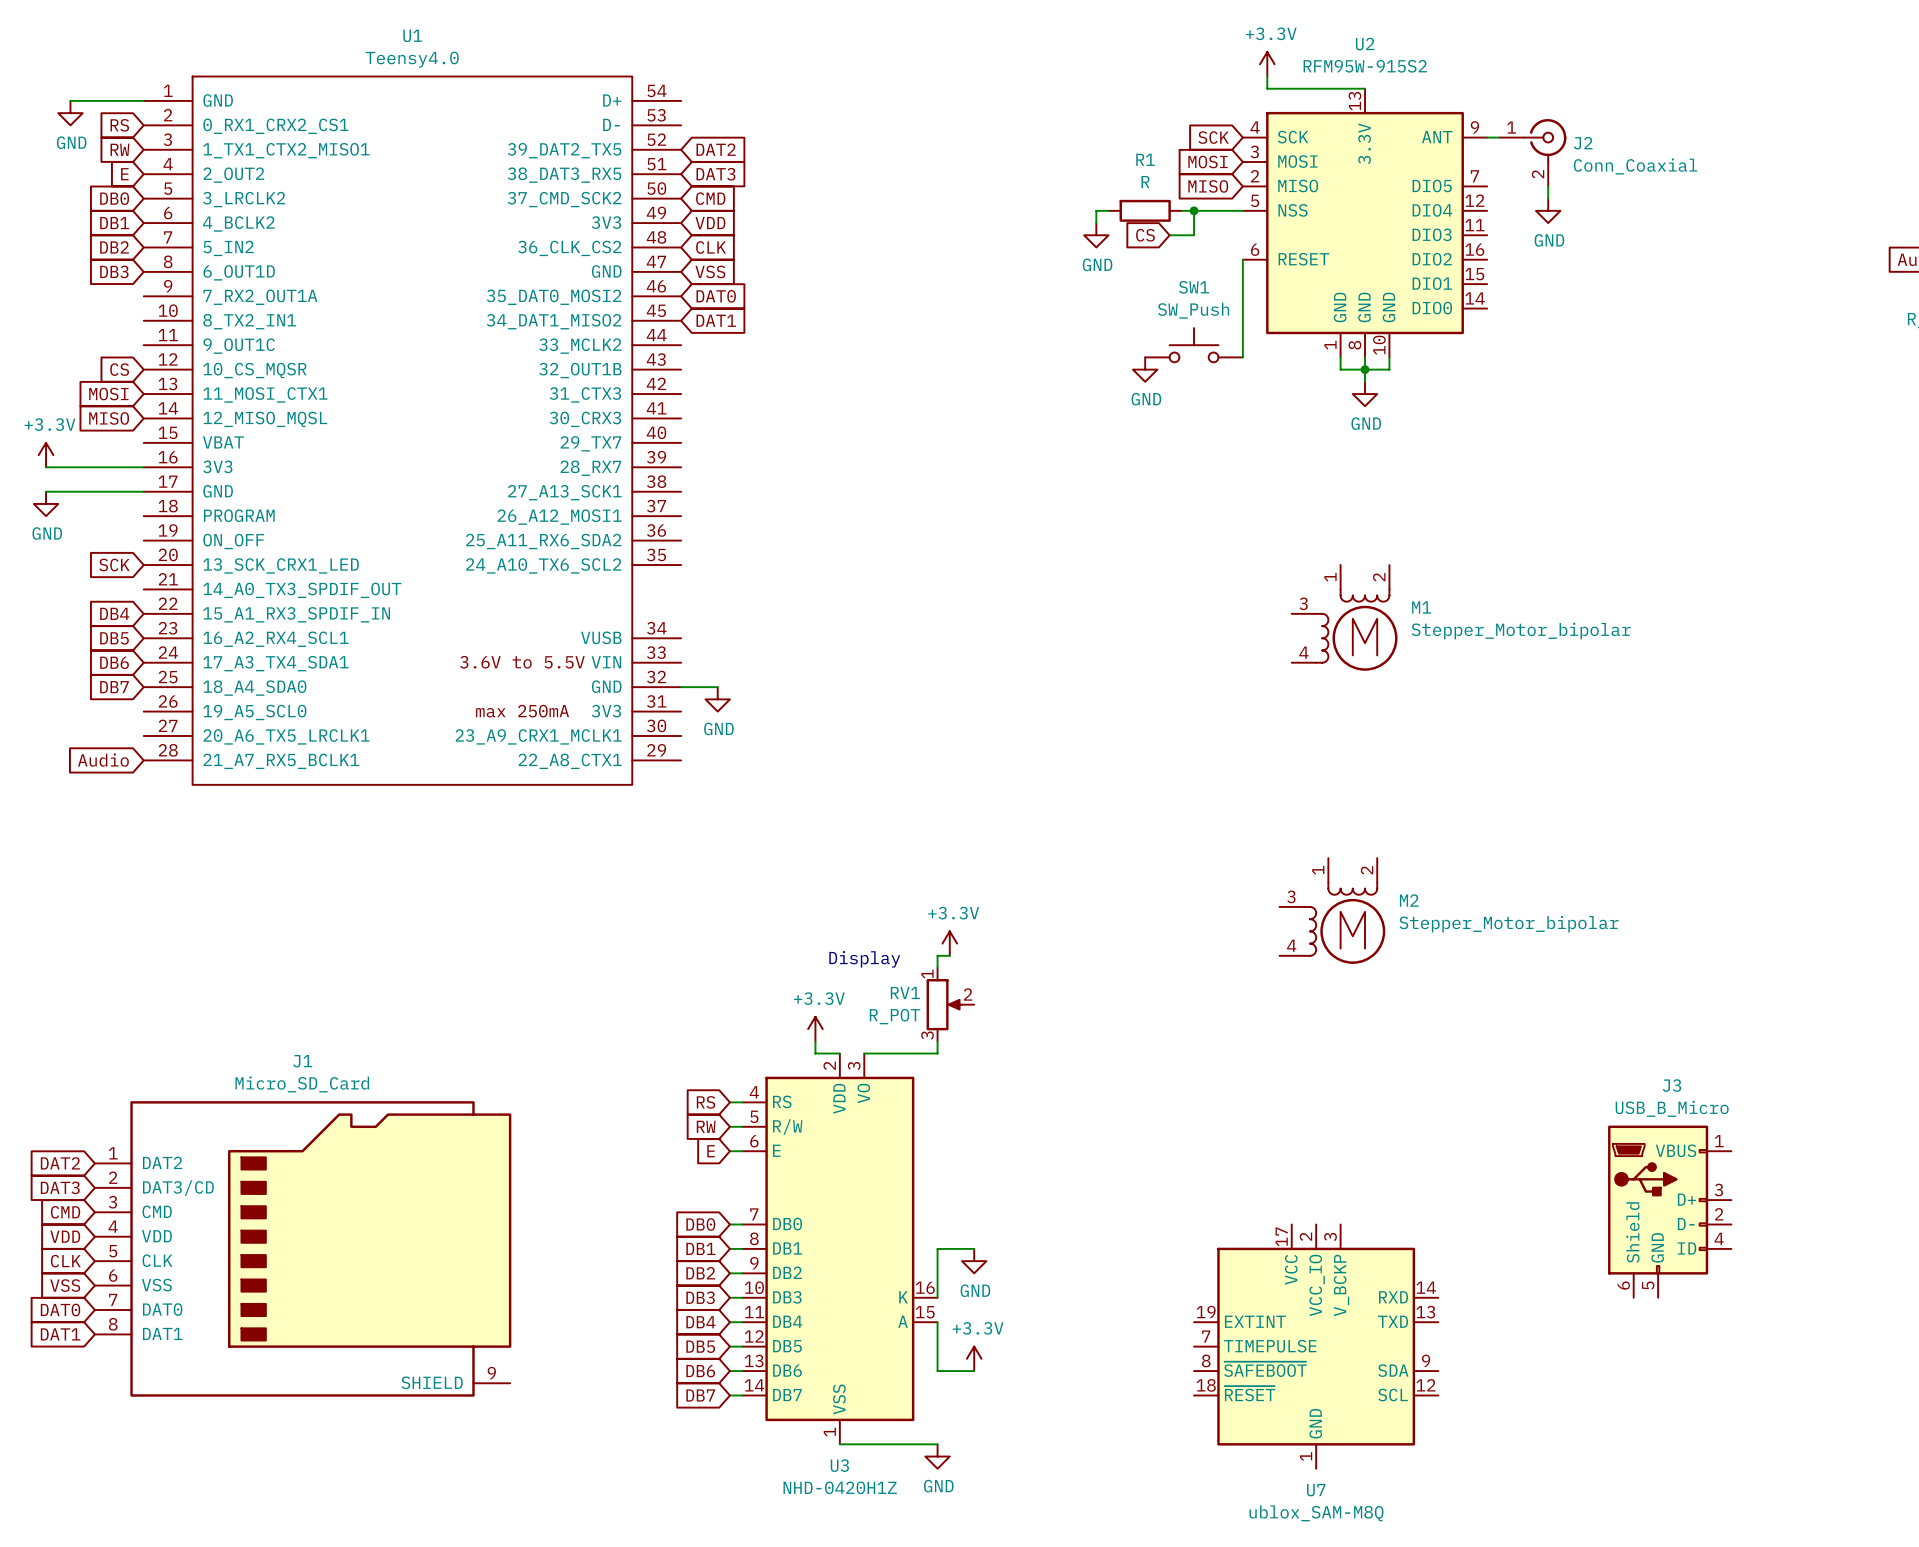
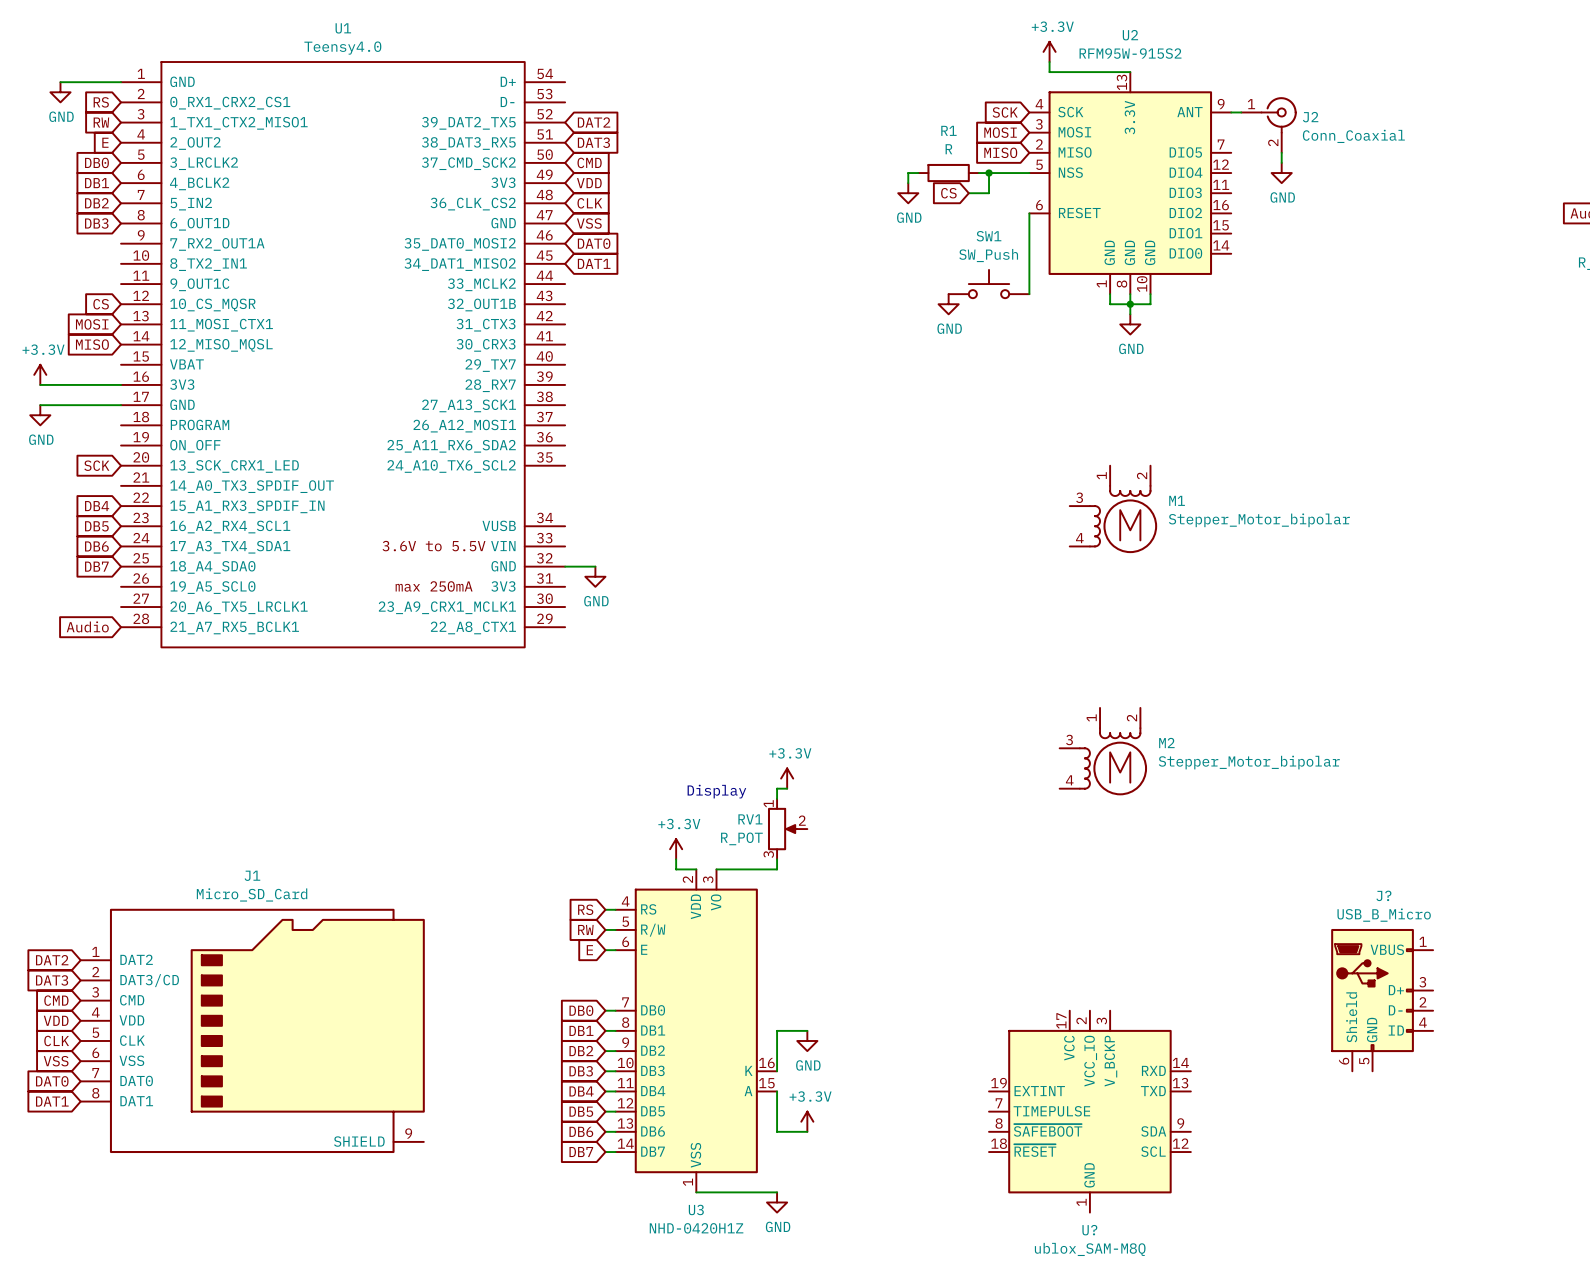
J3 name: J3 (1671, 1085) -> J? (1383, 895)
U7 name: U7 (1316, 1490) -> U? (1089, 1230)

